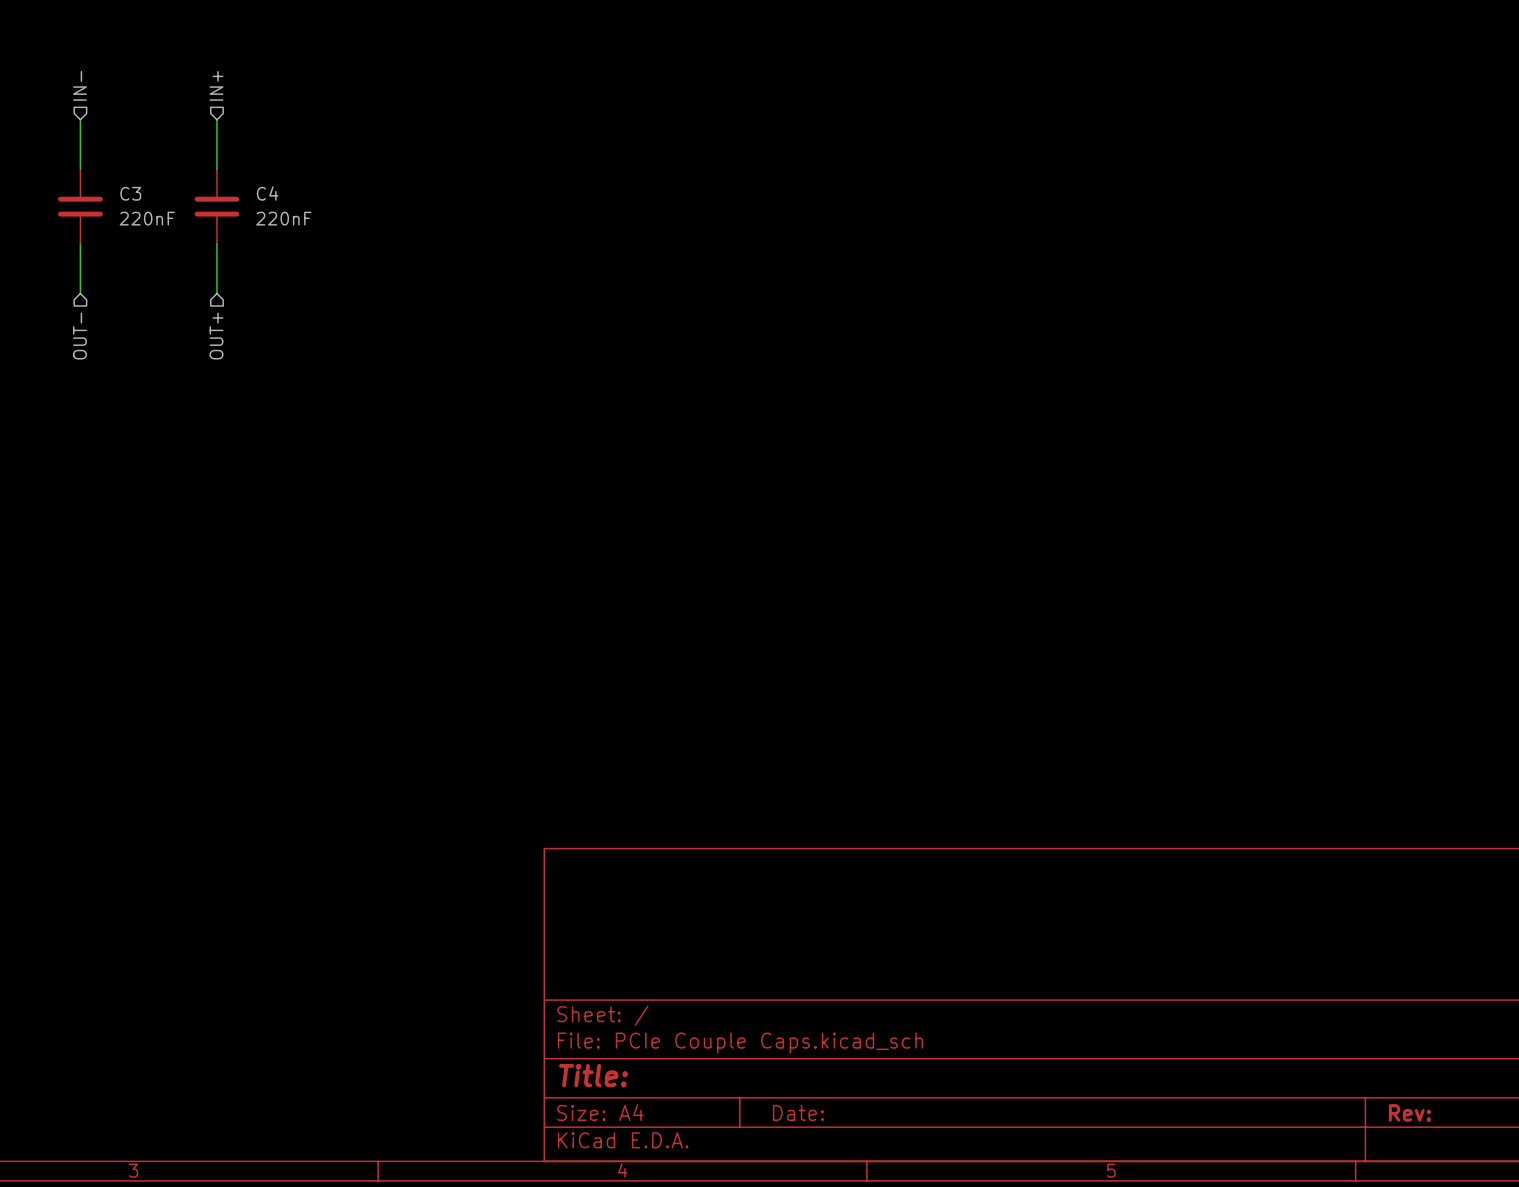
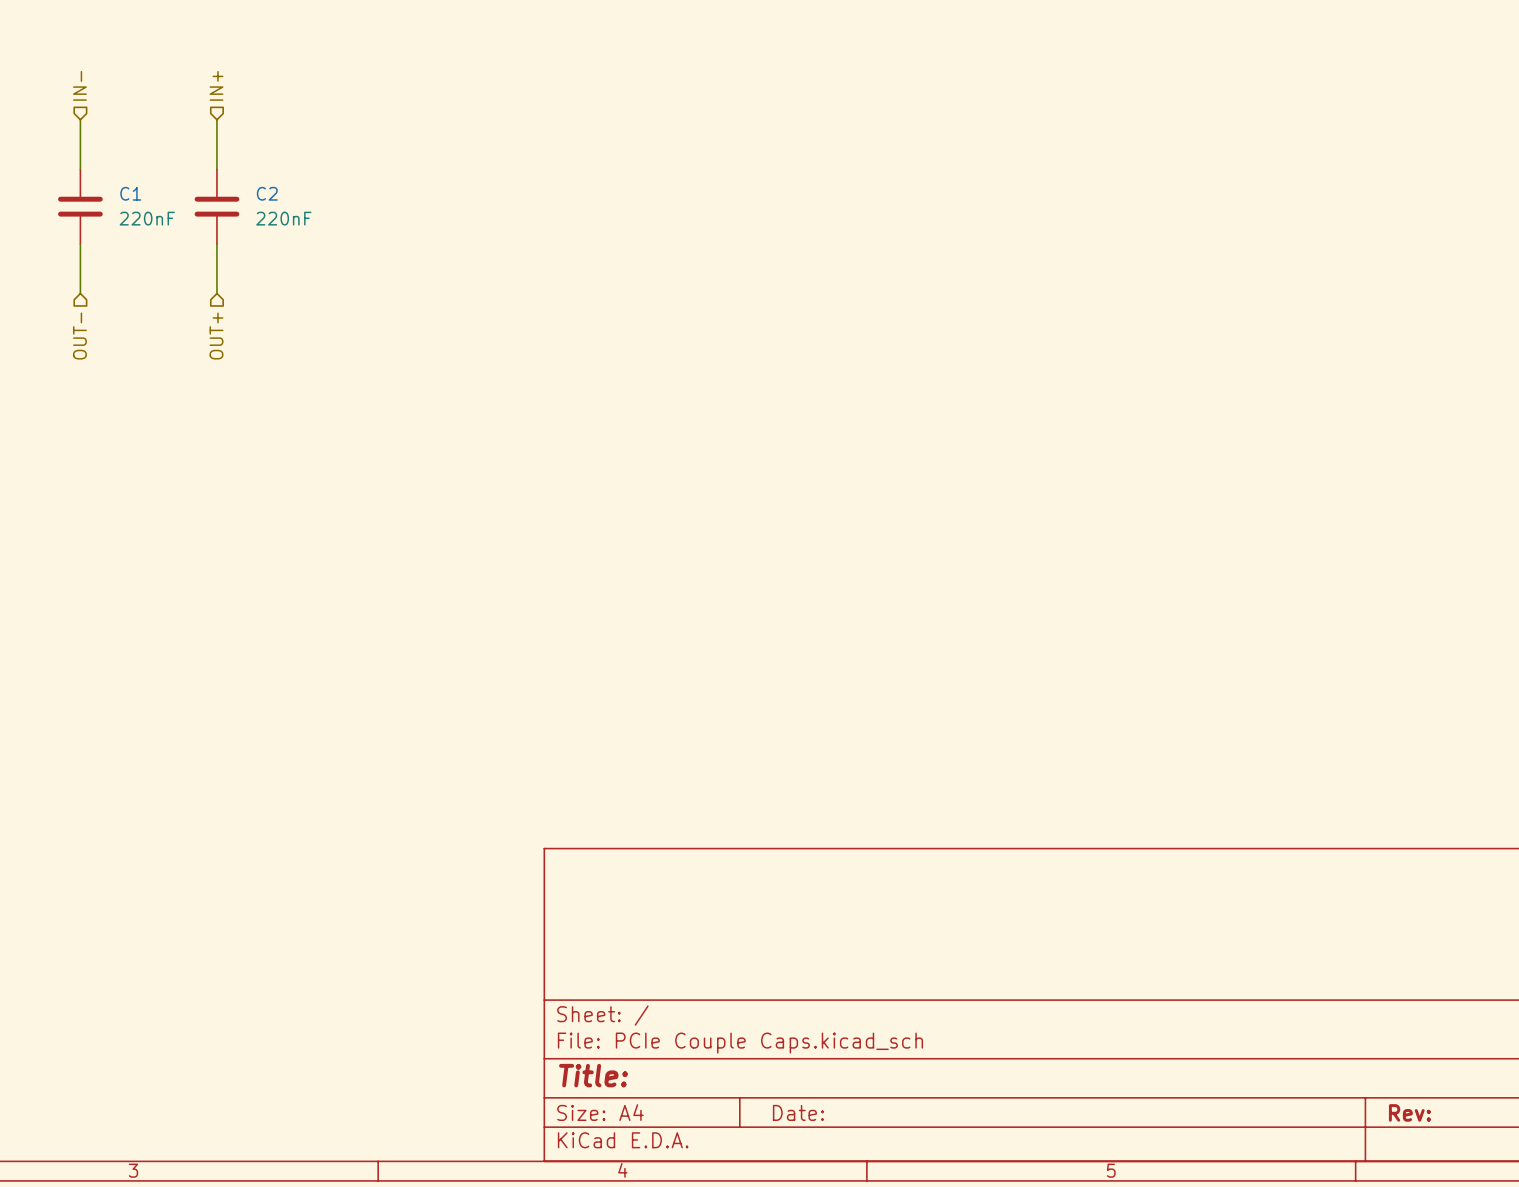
C3 name: C3 (130, 193) -> C1 (130, 193)
C4 name: C4 (267, 193) -> C2 (267, 193)

